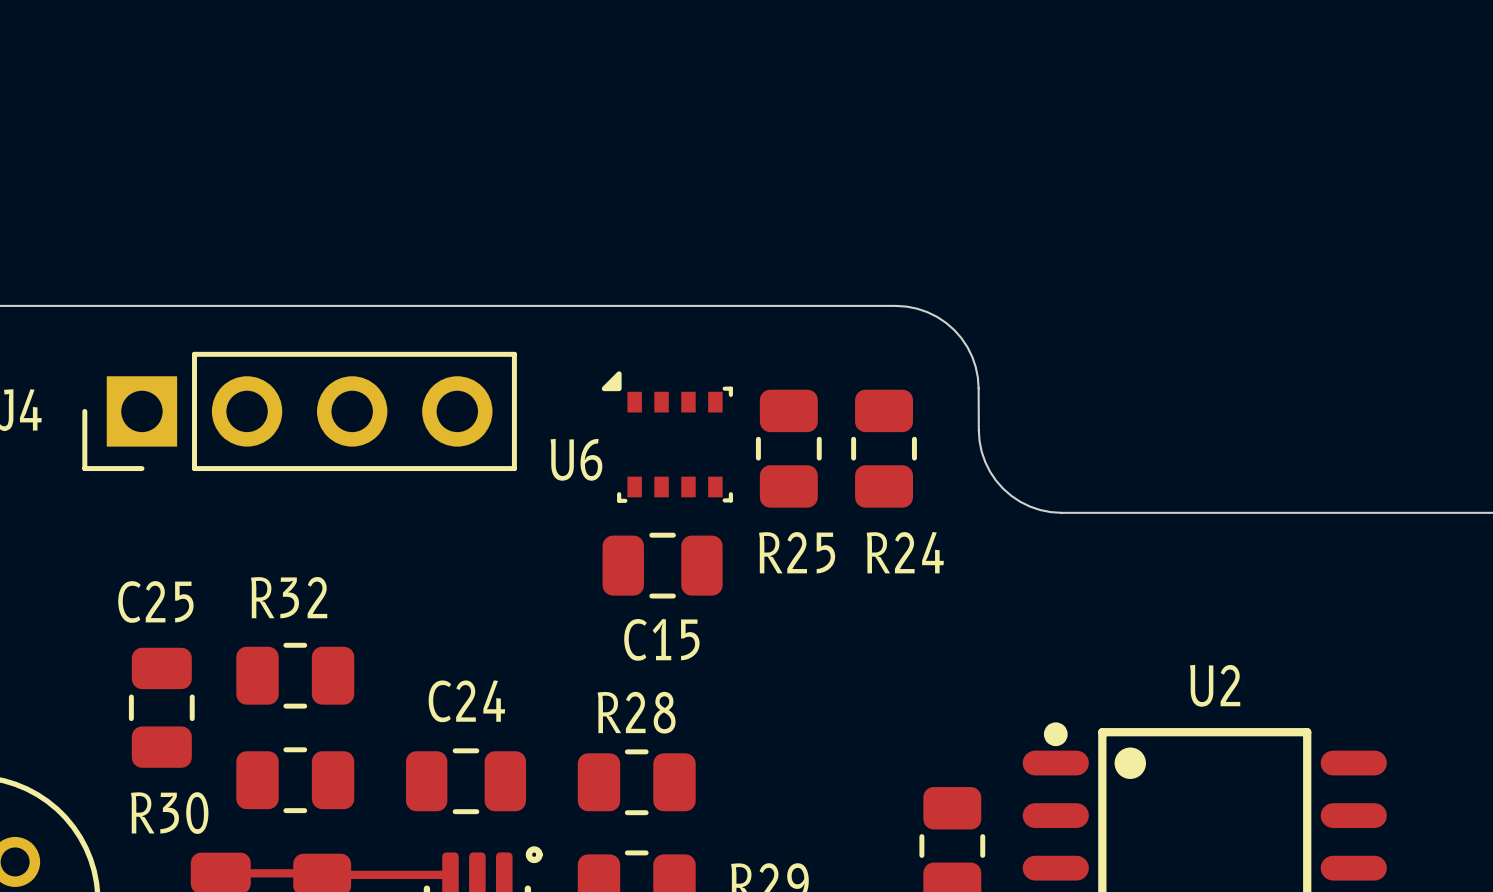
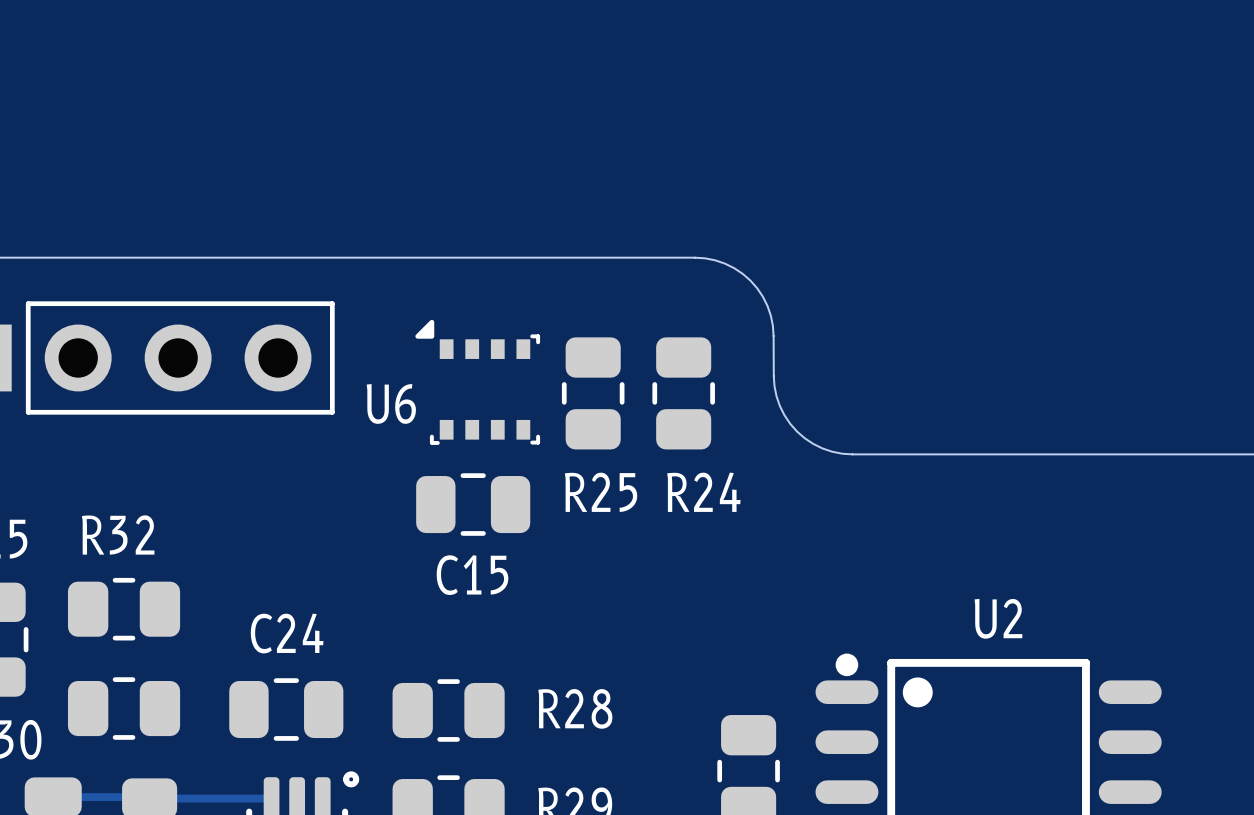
R28 name position: R28 (636, 712) -> R28 (575, 708)

